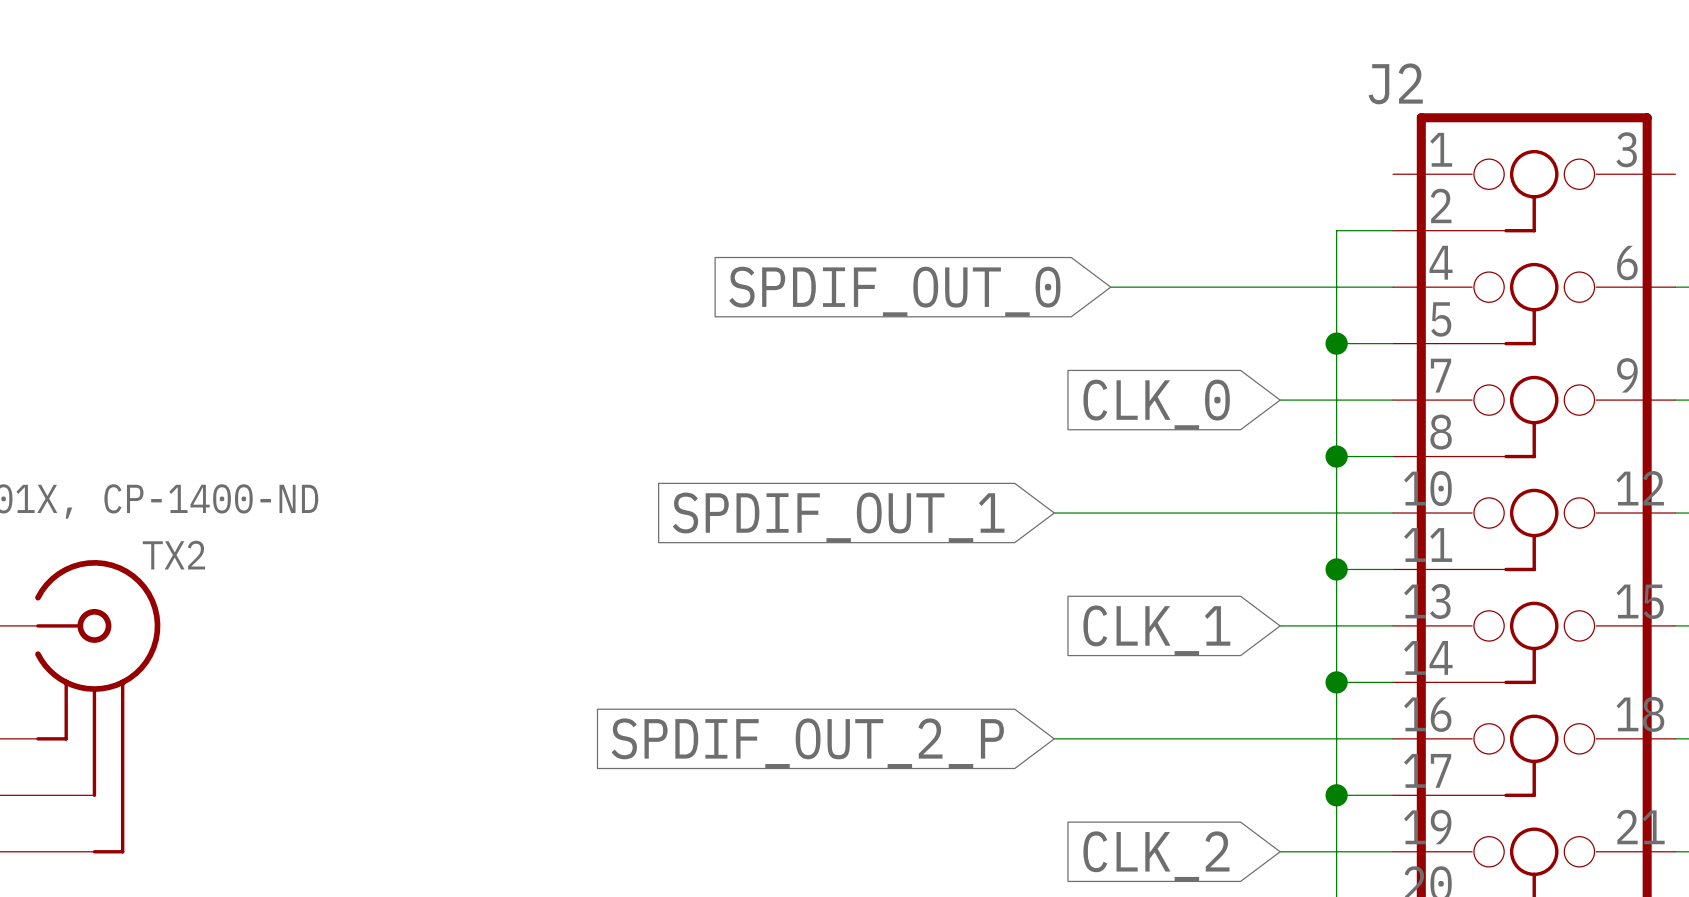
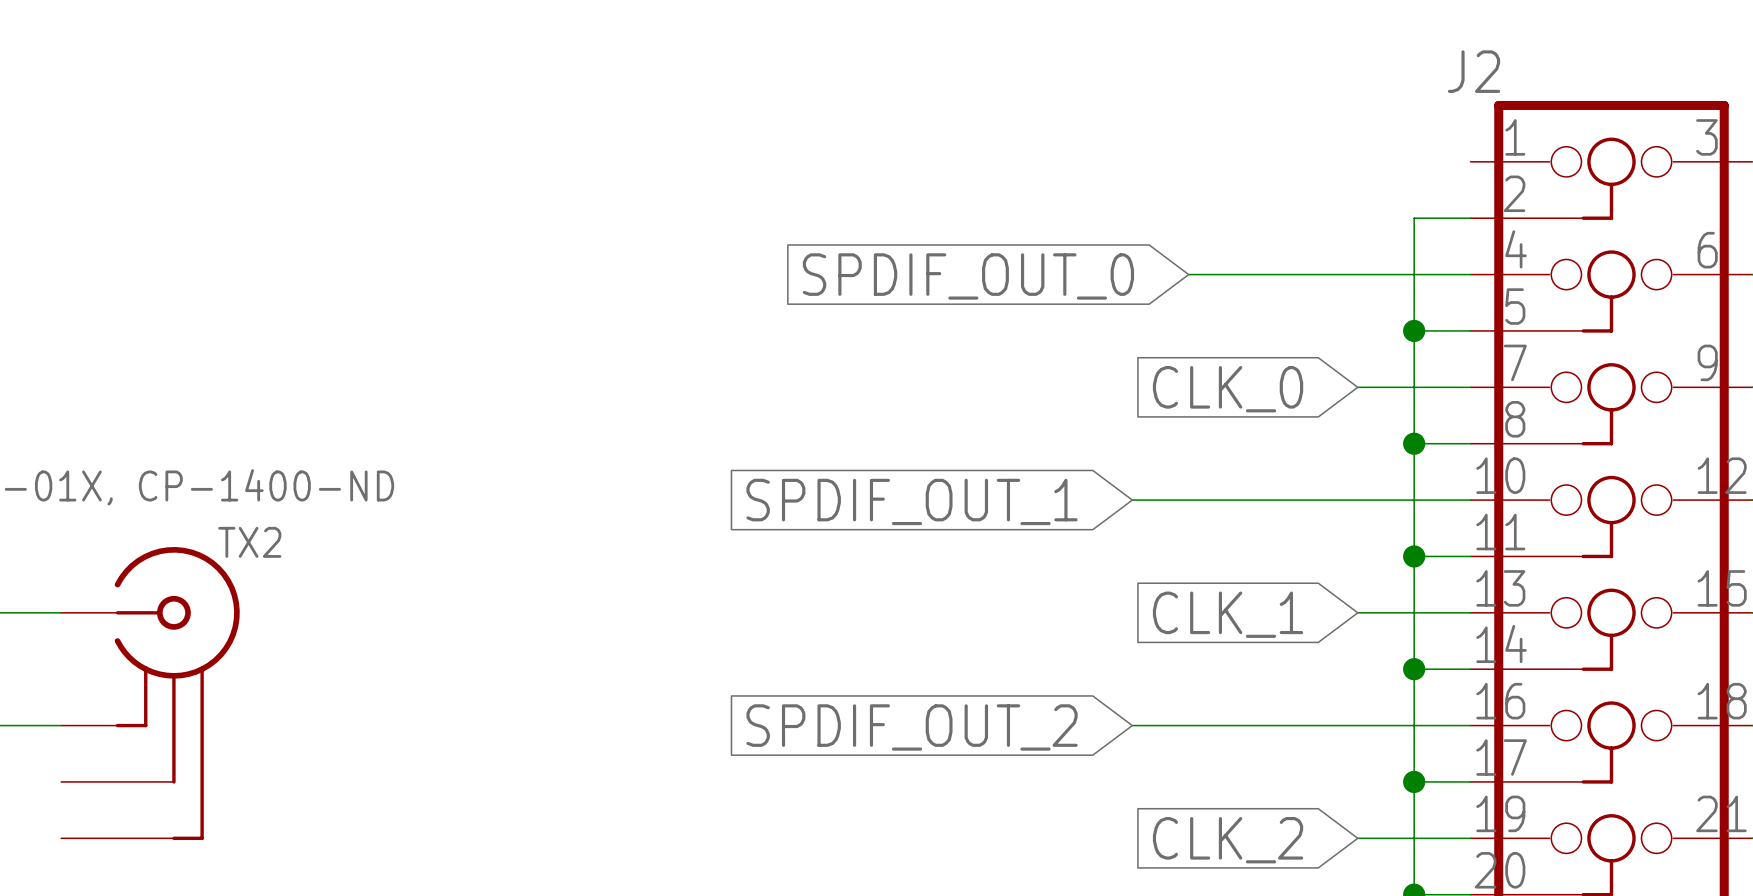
global label: SPDIF_OUT_2_P (807, 743) -> SPDIF_OUT_2 (912, 727)

